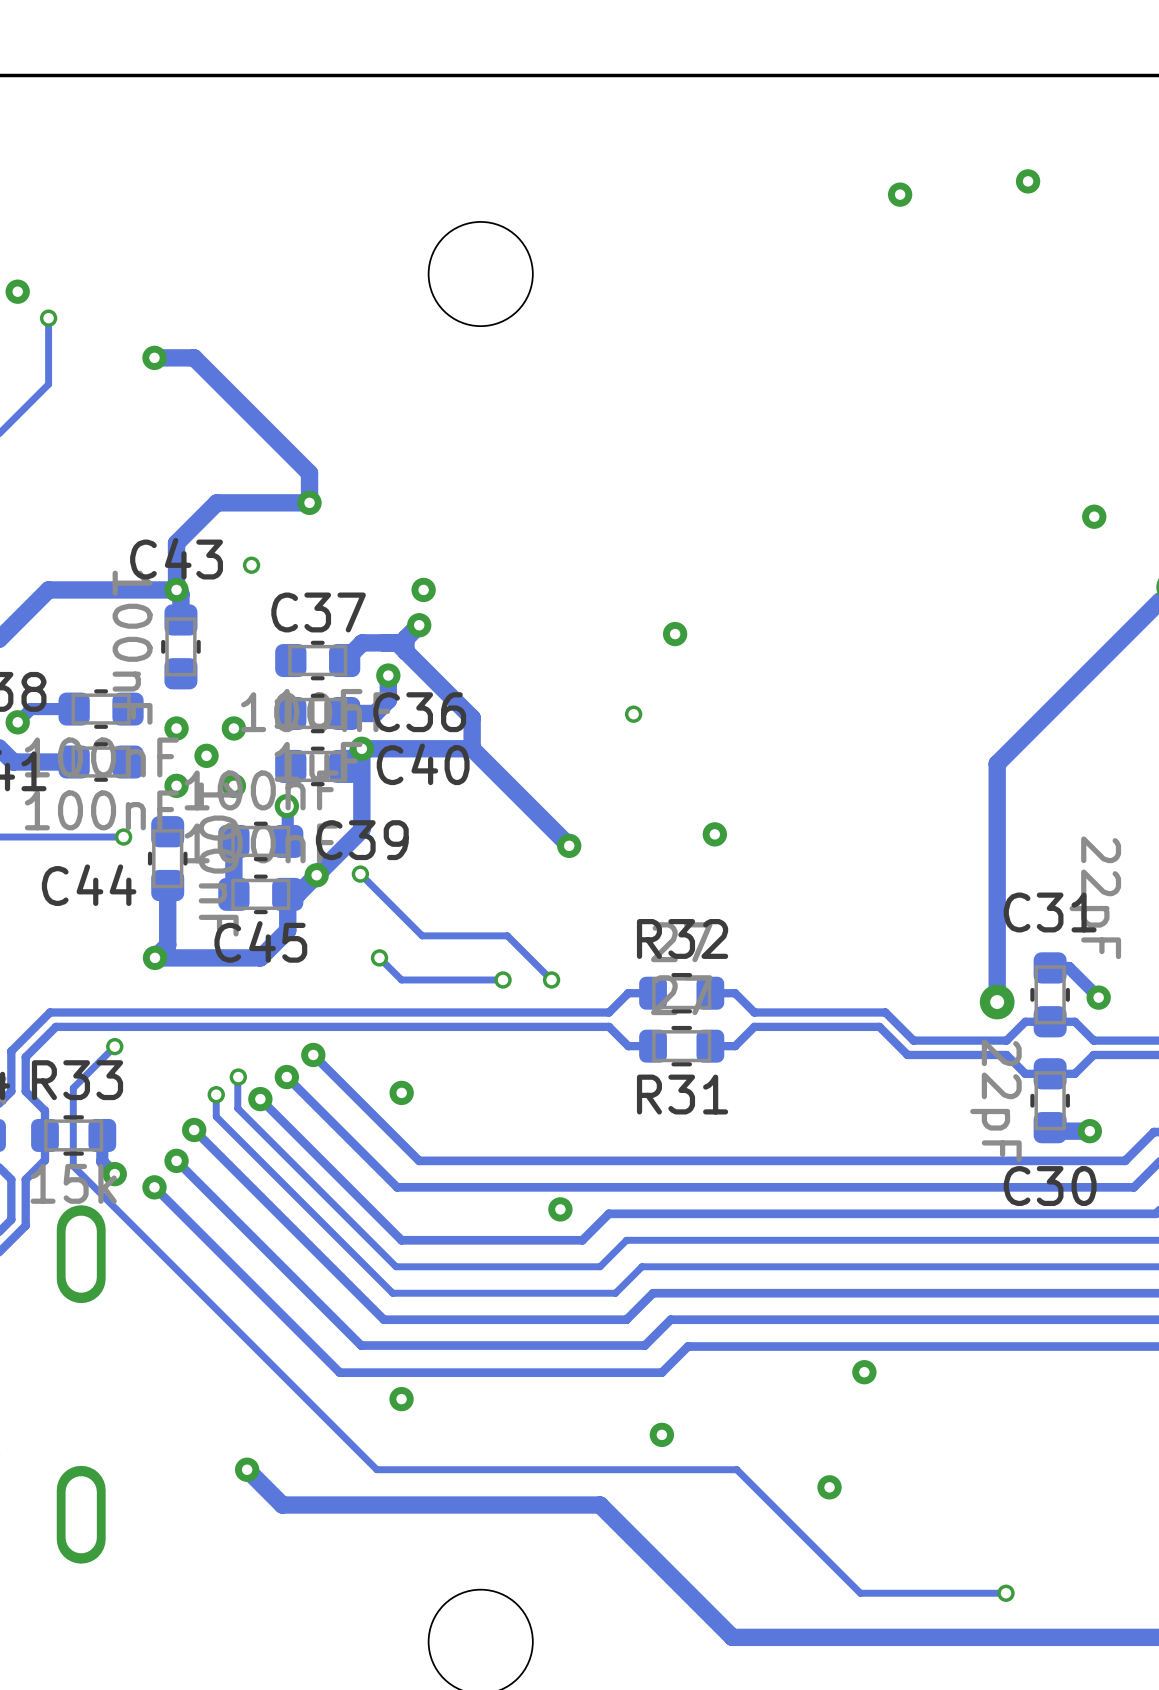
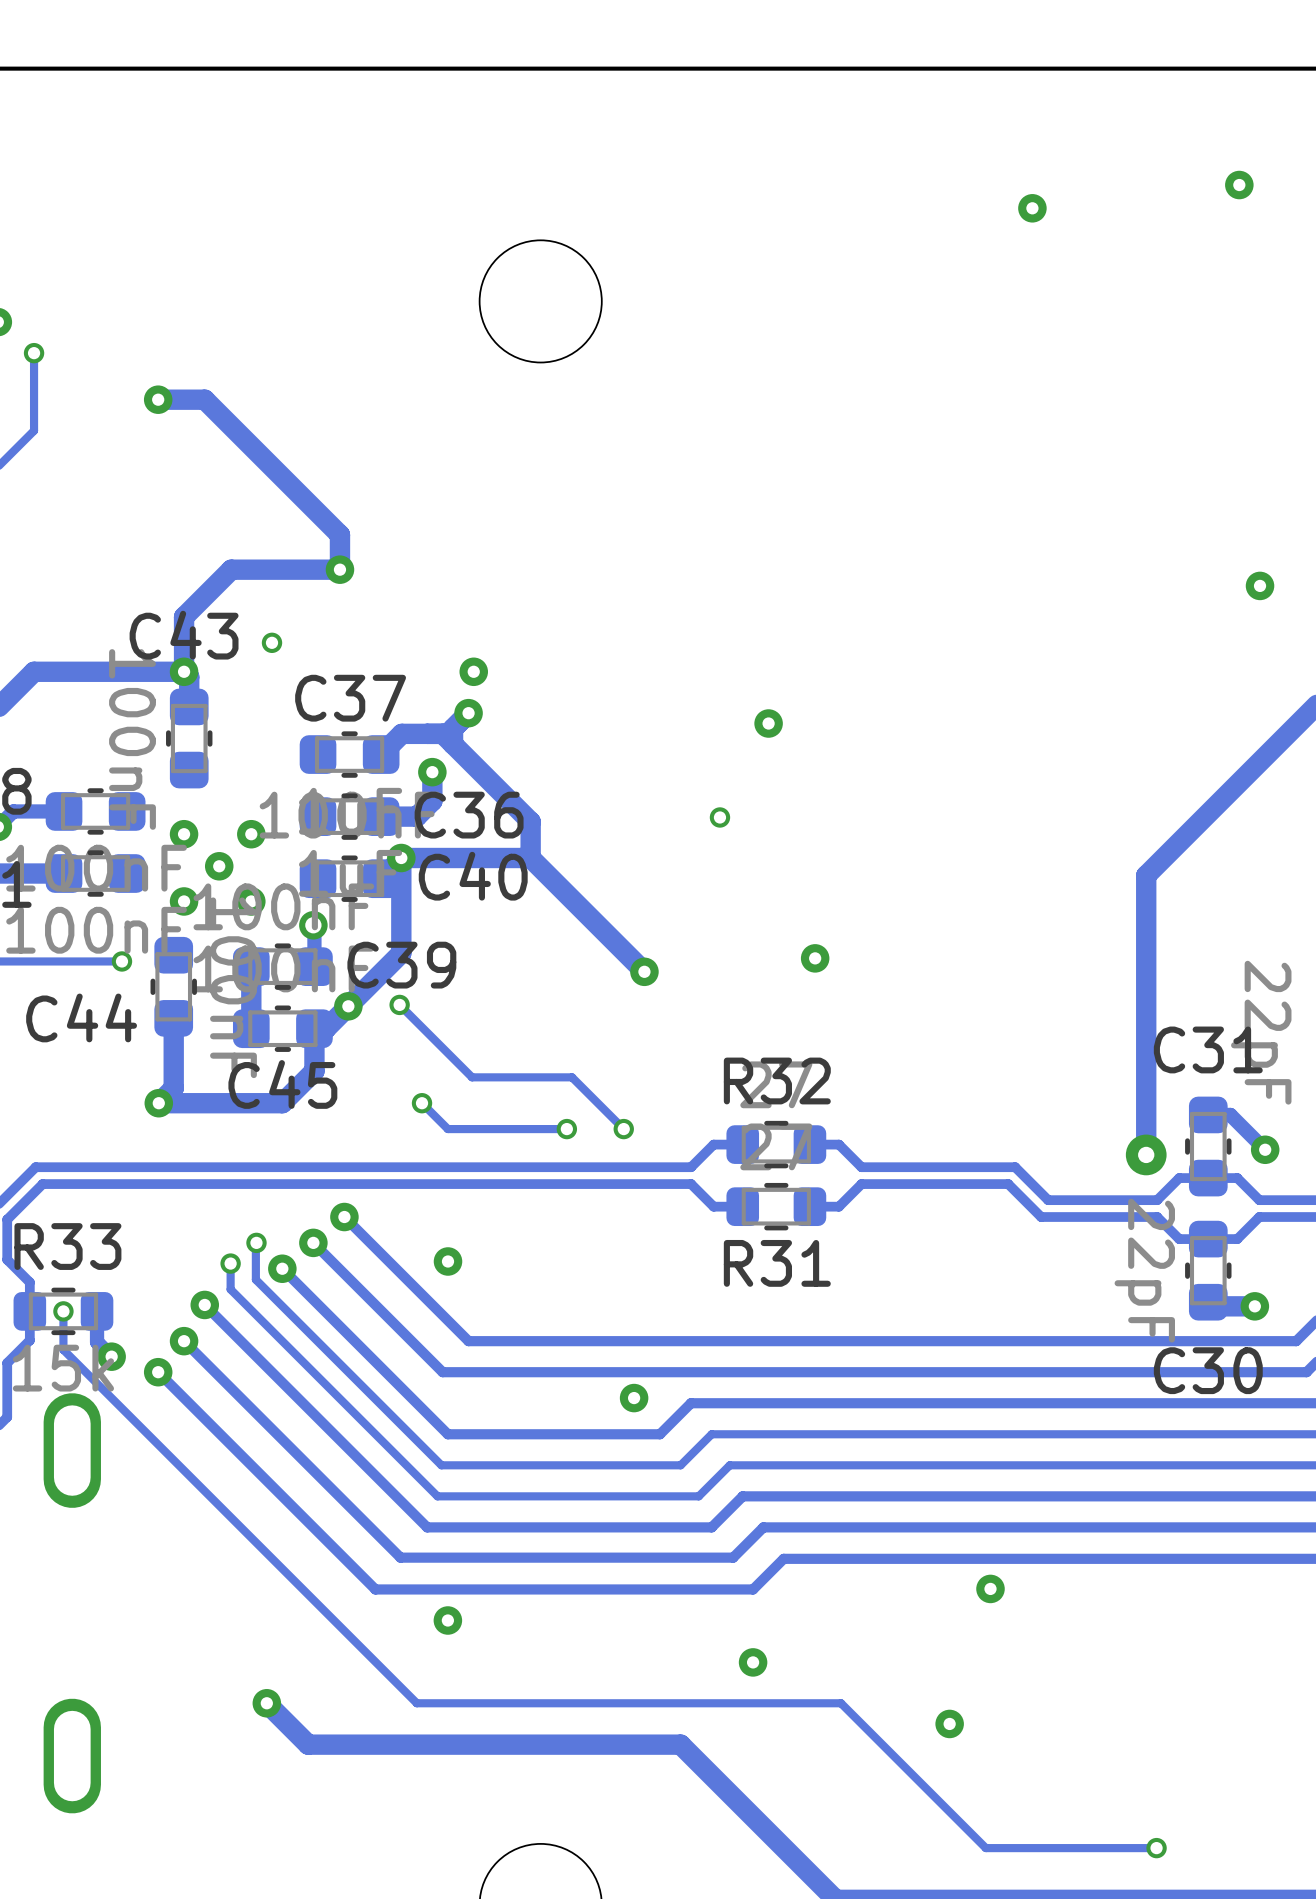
via position: (1028, 181) -> (1239, 185)
track: (114, 1046) (73, 1088) (73, 1166) (376, 1469) -> (63, 1311) (63, 1349) (418, 1703)
via position: (114, 1046) -> (63, 1311)

